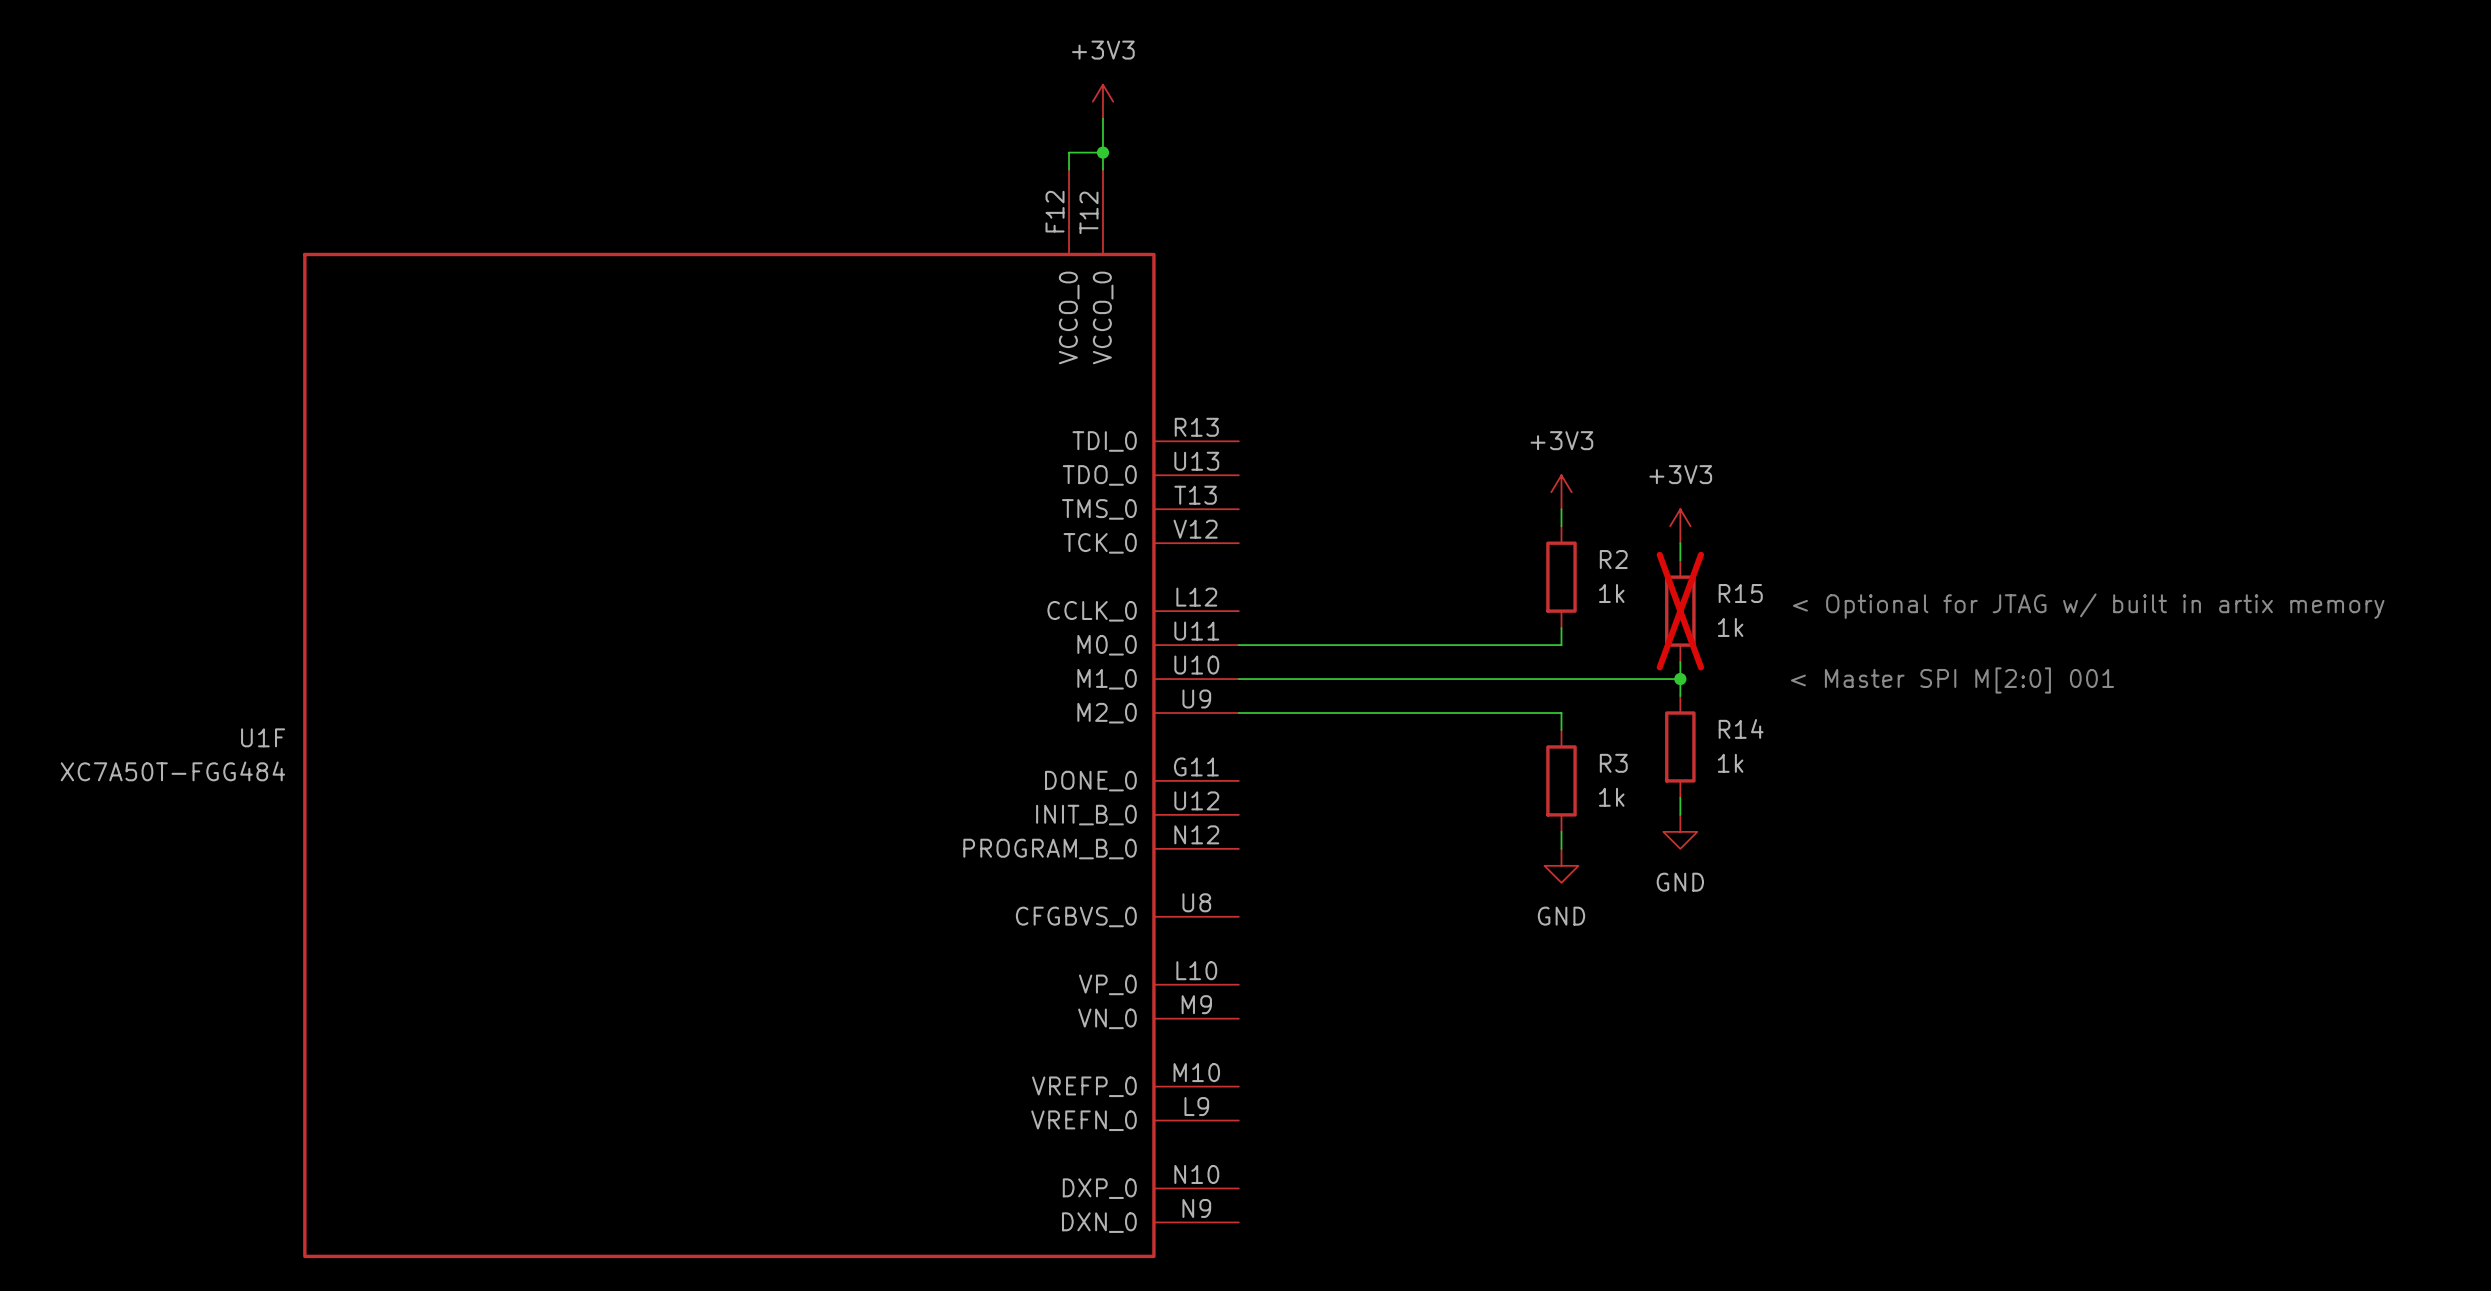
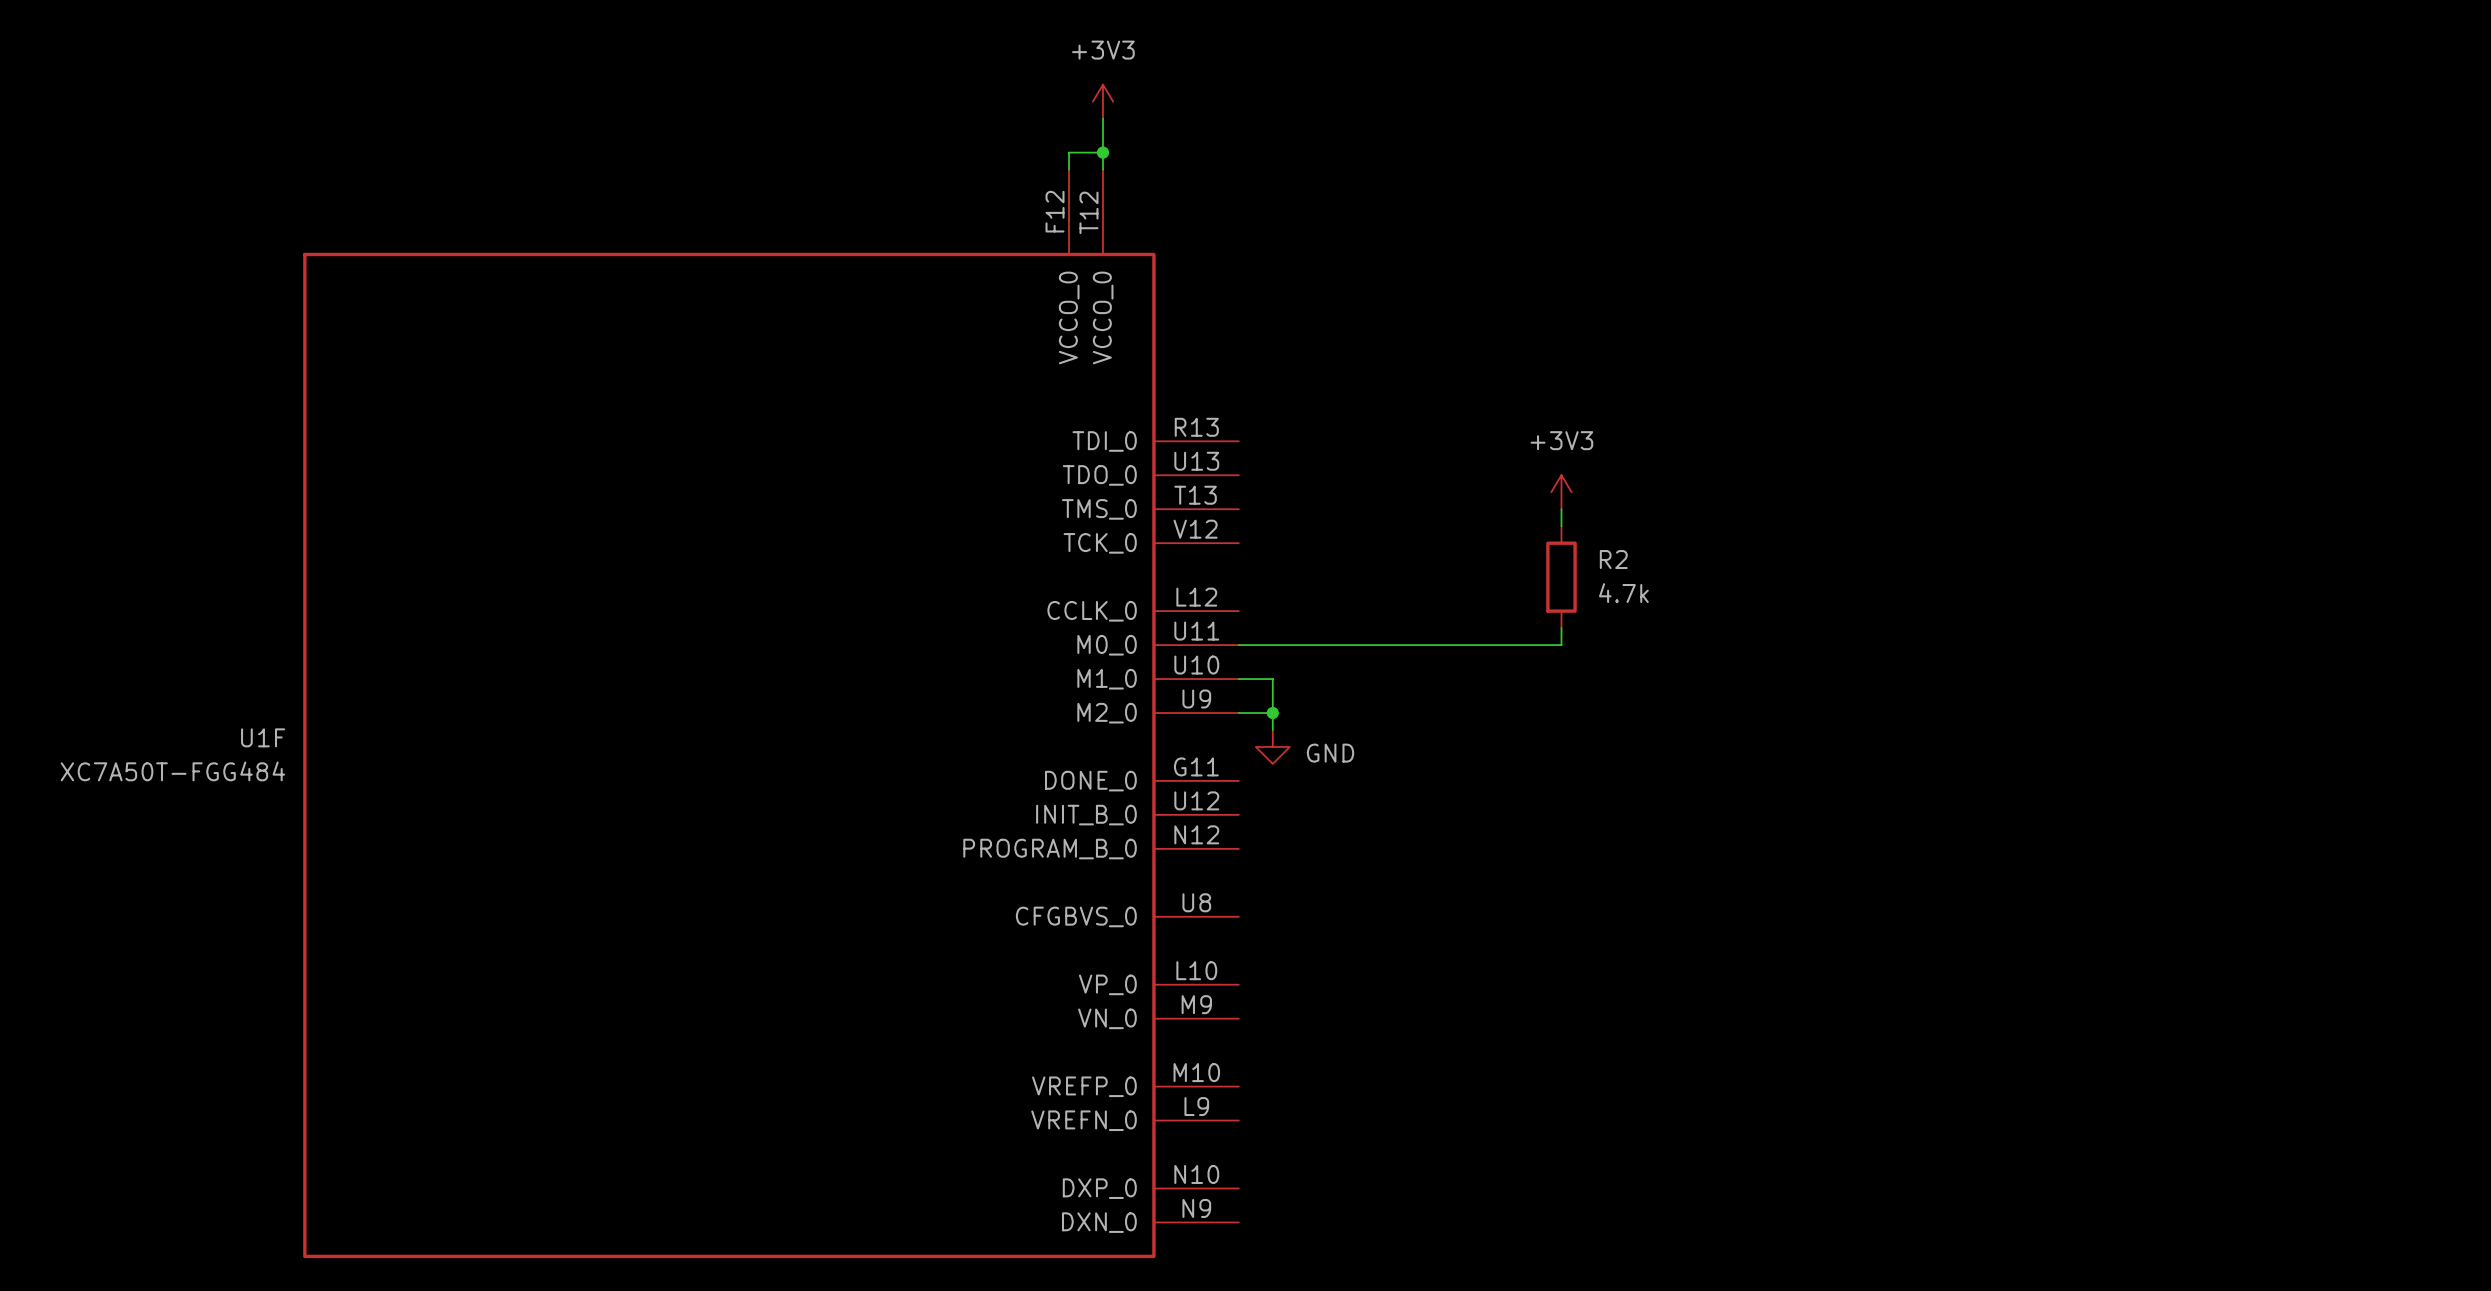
power symbol: +3V3 (1680, 526) -> none
wire: (1680, 543) (1680, 560) -> none
R2 value: 1k (1611, 593) -> 4.7k (1623, 593)
text: < Optional for JTAG w/ built in artix memory (2088, 606) -> none
R15: 1k (1680, 611) -> none
wire: (1680, 662) (1680, 696) -> none
wire: (1272, 679) (1680, 679) -> (1272, 679) (1272, 729)
junction: (1680, 679) -> none
text: < Master SPI M[2:0] 001 (1952, 680) -> none
wire: (1272, 713) (1561, 713) (1561, 729) -> none
junction: none -> (1272, 713)
power symbol: none -> GND (1272, 746)
R14: 1k (1680, 746) -> none
R3: 1k (1561, 780) -> none
wire: (1680, 797) (1680, 814) -> none
wire: (1561, 831) (1561, 848) -> none
power symbol: GND (1680, 831) -> none
power symbol: GND (1561, 865) -> none

